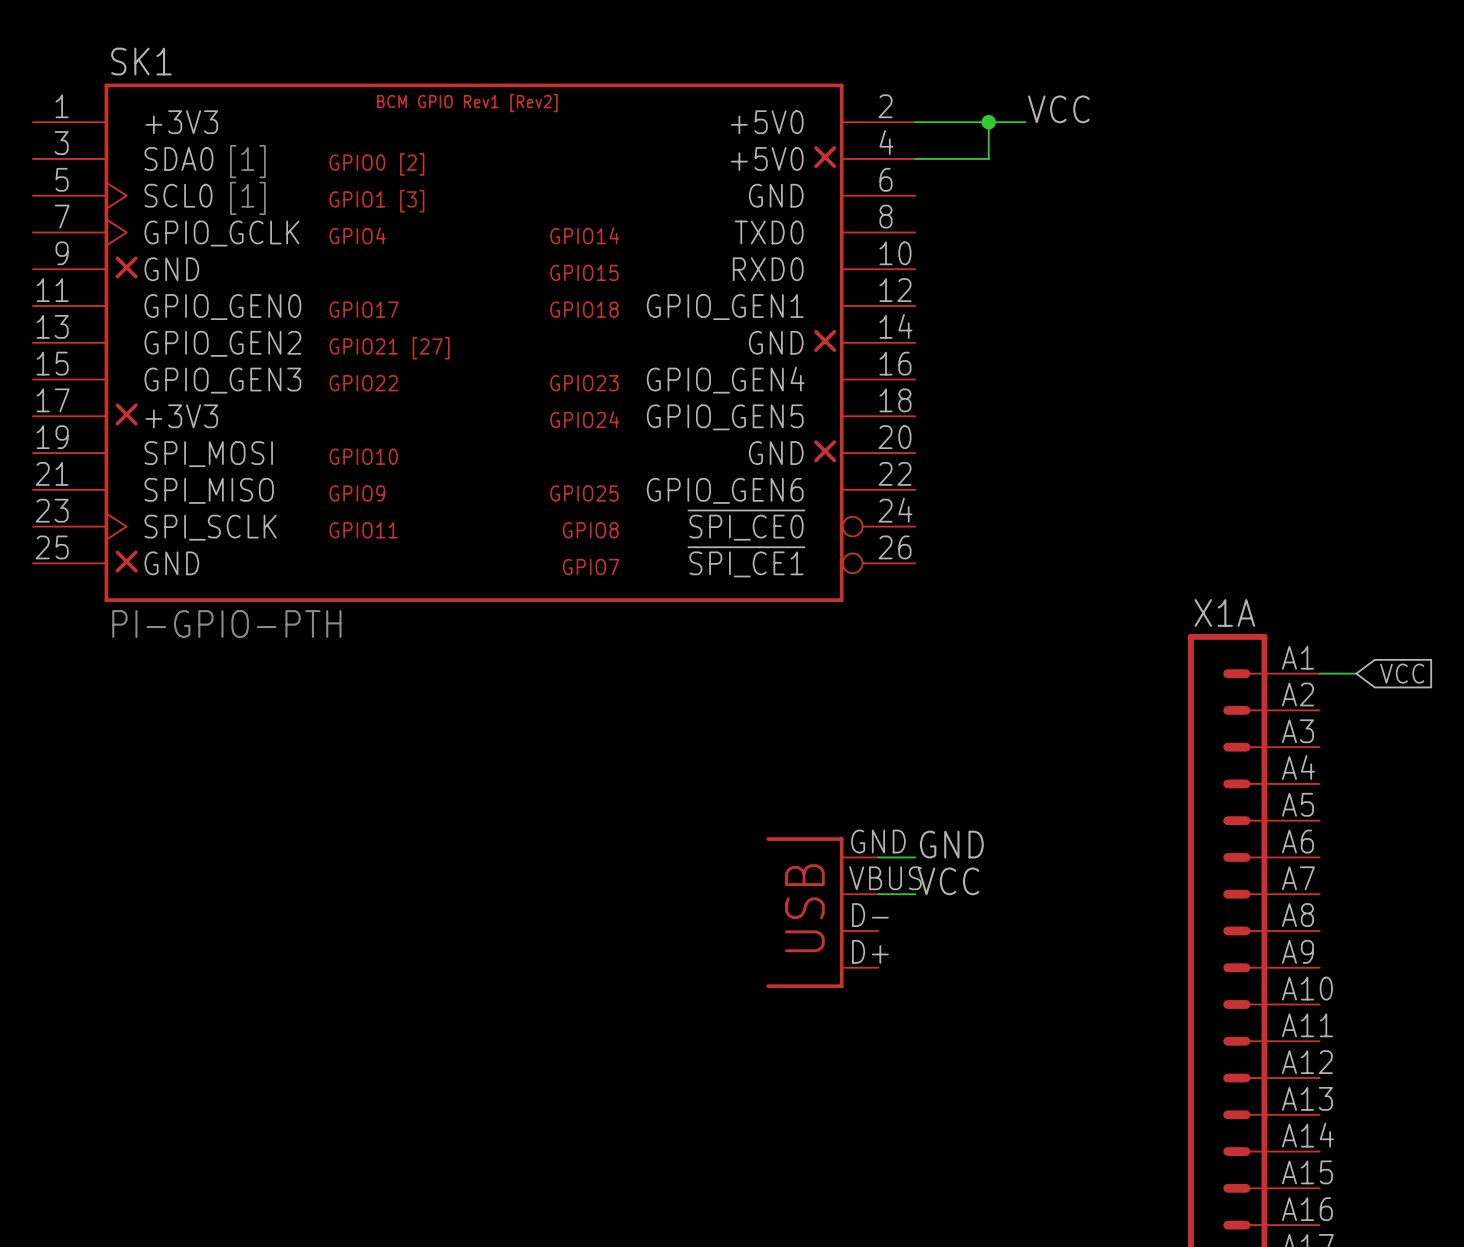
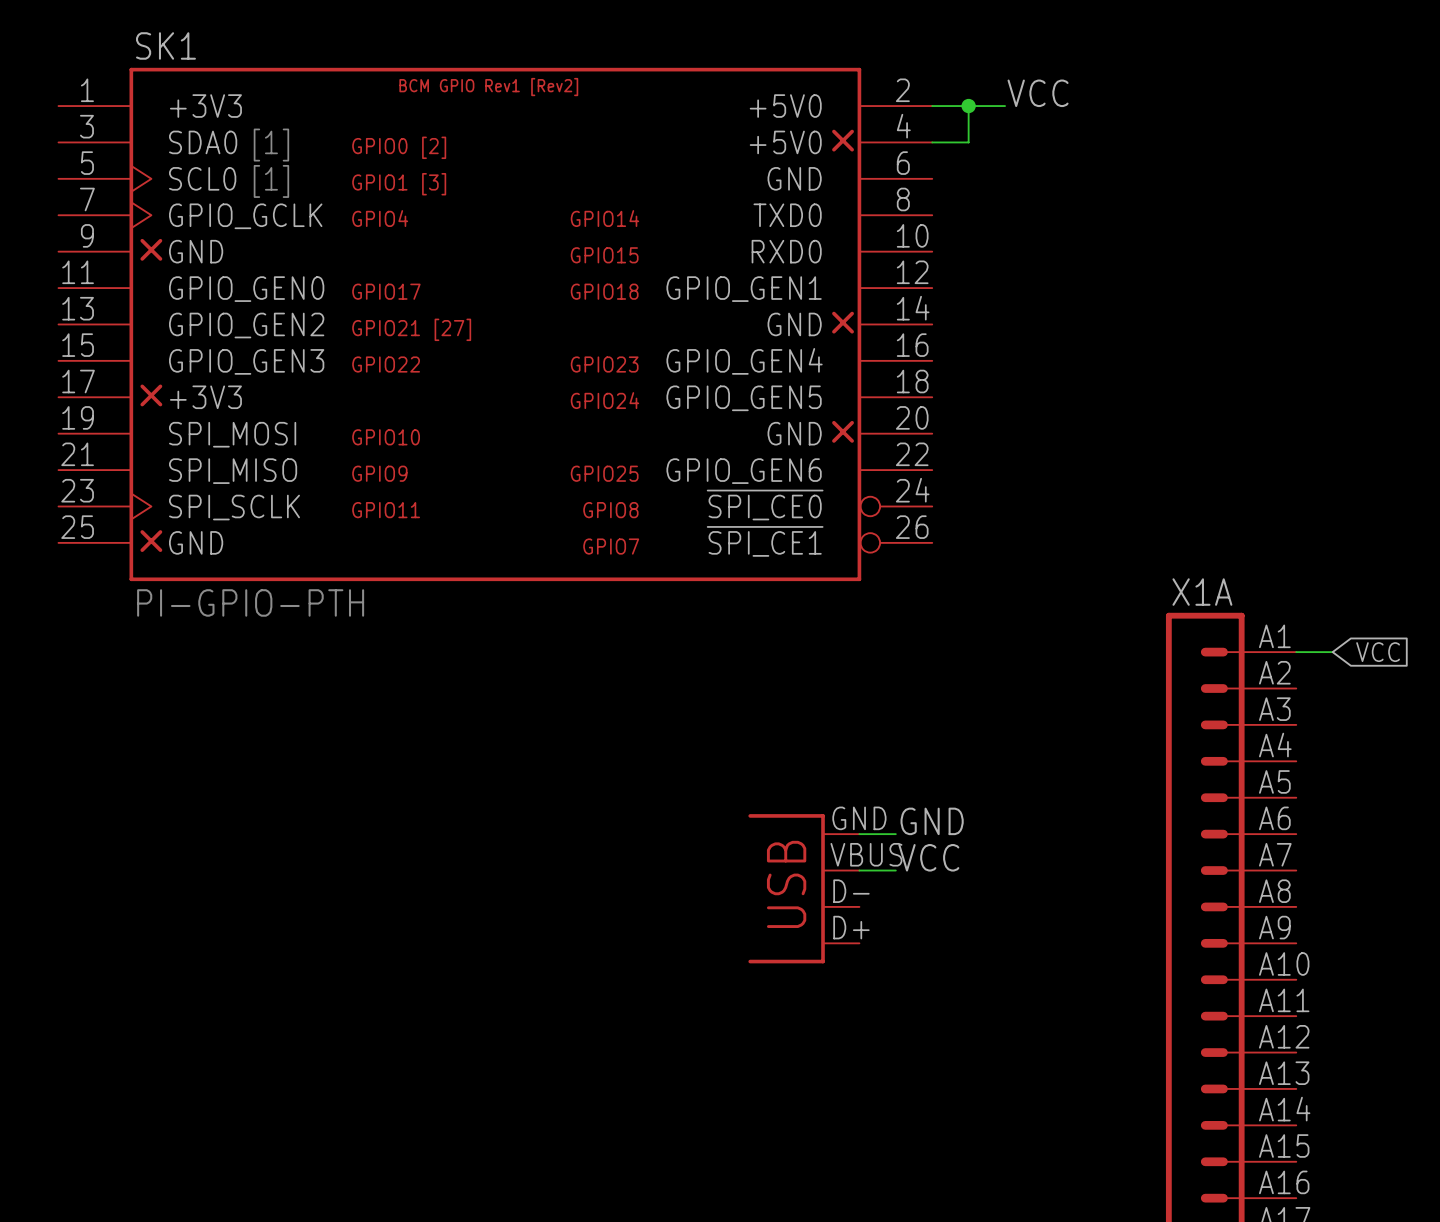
SK1 position: (474, 342) -> (495, 324)

